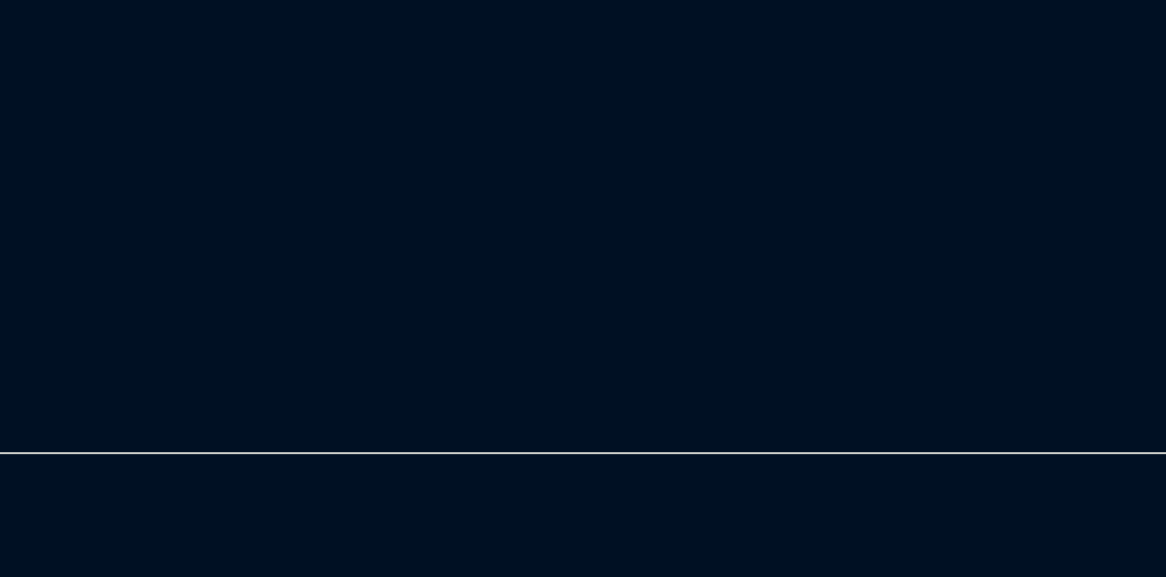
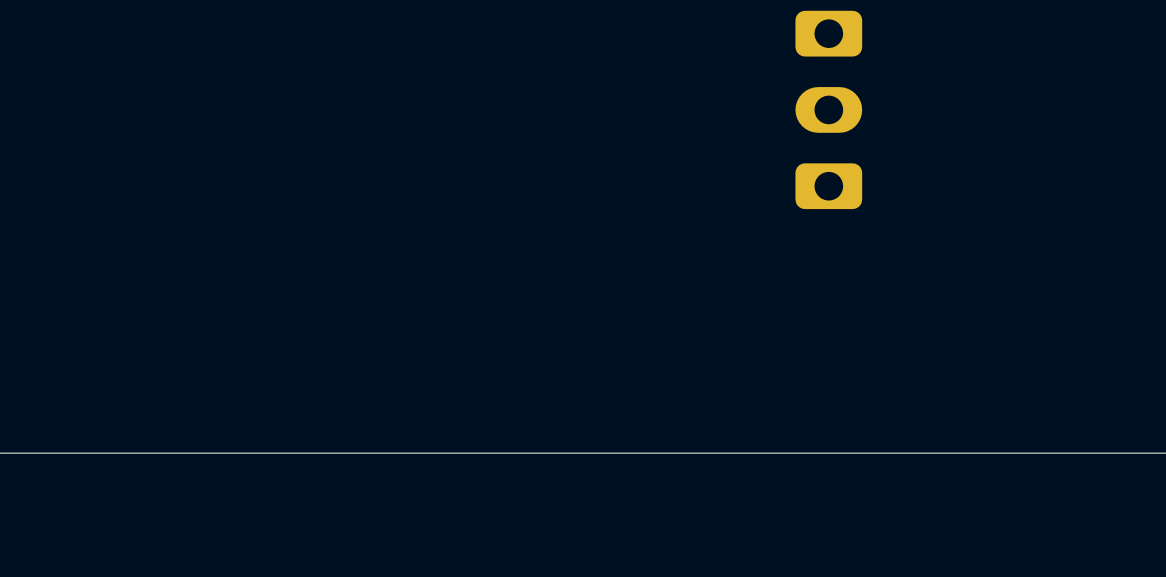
part: none -> (828, 109)

